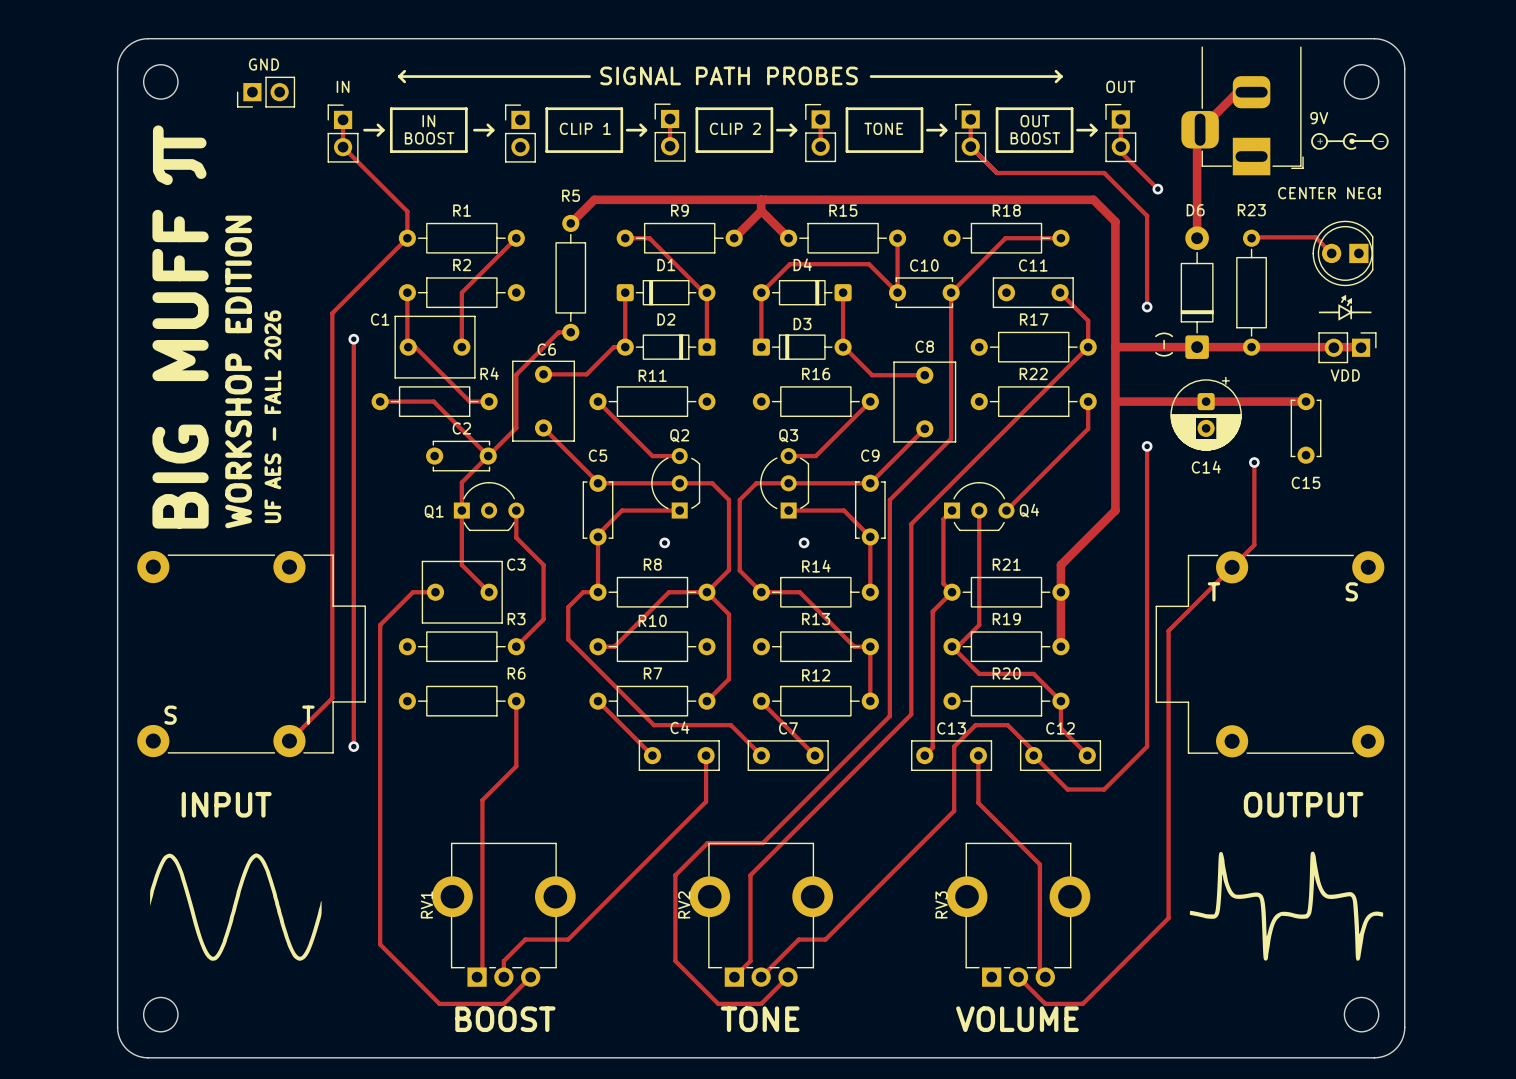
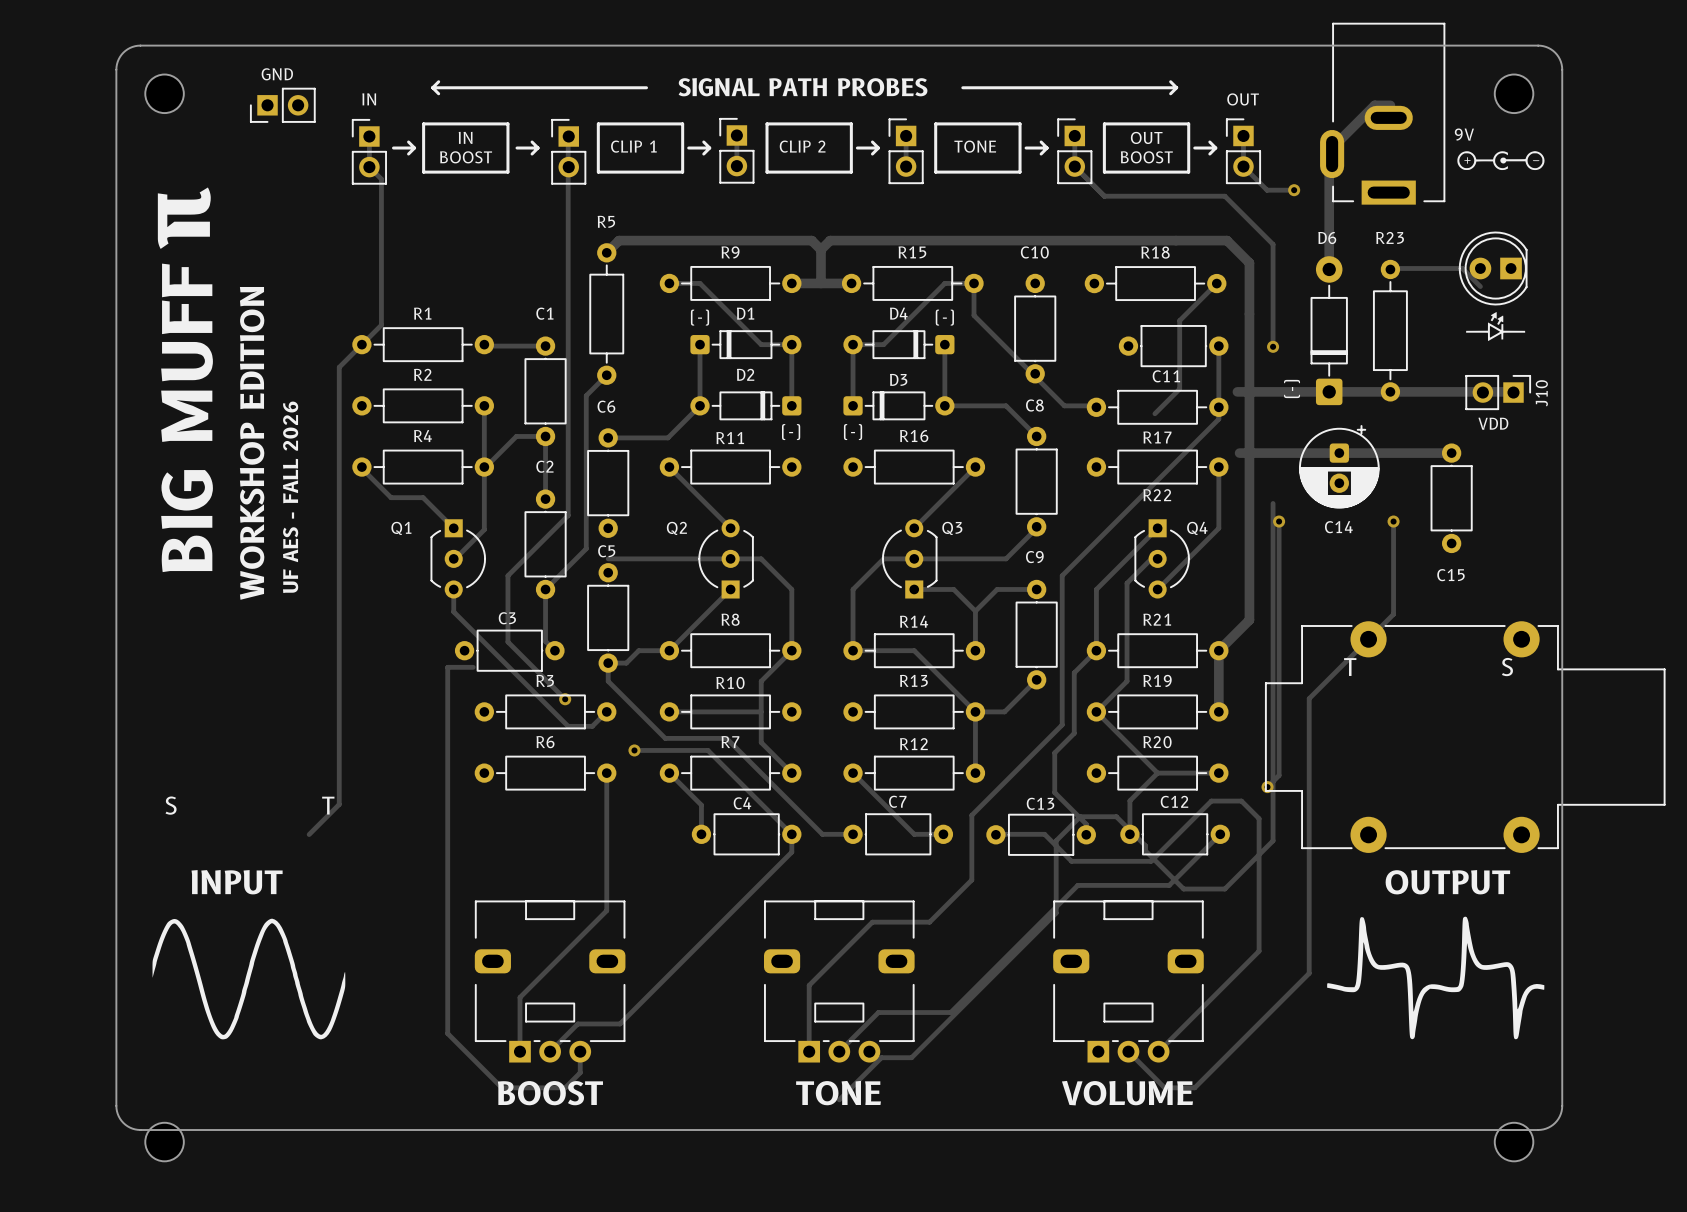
board edge: (147, 38) (1374, 38) (1384, 40) (1393, 45) (1401, 55) (1404, 69) (1404, 1027) (1403, 1037) (1398, 1046) (1387, 1054) (1374, 1057) (147, 1057) (137, 1056) (129, 1051) (120, 1040) (117, 1027) (117, 69) (120, 55) (126, 47) (134, 41) (147, 38) -> (140, 45) (132, 46) (123, 52) (118, 59) (116, 69) (116, 1105) (118, 1116) (125, 1124) (140, 1130) (1538, 1130) (1548, 1127) (1556, 1120) (1562, 1105) (1562, 69) (1559, 59) (1553, 50) (1538, 45) (140, 45)
part: none -> (1382, 113)
part: (1242, 110) -> none
track: none -> (568, 135) (568, 515) (507, 575) (507, 642) (565, 699)
track: (1120, 146) (1120, 152) (1157, 189) -> (1243, 166) (1267, 190)
track: (353, 157) (407, 211) (407, 238) (332, 313) (332, 698) (316, 714) -> (381, 179) (381, 325) (339, 367) (339, 804)
track: none -> (1267, 190) (1294, 190)
via position: (1157, 189) -> (1294, 190)
text: CENTER NEG! (1329, 193) -> none
track: (1106, 212) (1093, 199) (594, 199) (570, 223) -> (1227, 240) (830, 240) (820, 249)
track: none -> (820, 249) (811, 240) (619, 240) (606, 252)
track: none -> (820, 249) (820, 283)
track: (1115, 221) (1115, 510) (1060, 564) (1060, 646) -> (1237, 250) (1249, 262) (1249, 620) (1218, 650) (1218, 711)
R1 position: (461, 238) -> (423, 344)
track: (516, 238) (461, 292) (461, 347) -> none
track: (625, 238) (649, 238) (703, 292) (706, 292) (706, 347) -> none
R9 position: (679, 238) -> (730, 283)
track: (734, 238) (761, 211) (761, 199) (761, 210) (788, 238) -> none
R15 position: (843, 238) -> (912, 283)
track: (897, 238) (897, 292) (869, 264) (789, 264) (761, 292) (761, 347) -> none
R18 position: (1006, 238) -> (1155, 283)
track: (1060, 238) (1005, 238) (951, 292) (951, 438) (889, 500) (889, 716) (762, 843) (707, 843) (675, 875) (675, 961) (718, 1003) (761, 1003) (787, 977) -> none
track: none -> (669, 283) (700, 283) (761, 344) (791, 344) (791, 405)
track: none -> (791, 283) (853, 283)
track: none -> (1216, 283) (1179, 320) (1179, 388) (1154, 413)
part position: (1342, 253) -> (1493, 268)
C10 name position: C10 (924, 265) -> C10 (1034, 252)
C11 name position: C11 (1033, 265) -> C11 (1166, 376)
R5 position: (570, 277) -> (606, 314)
C10 footprint: [888, 277, 960, 309] -> [1014, 273, 1057, 384]
C11 footprint: [992, 277, 1074, 309] -> [1118, 325, 1229, 367]
D1 text: none -> (-) (700, 317)
D4 text: none -> (-) (944, 317)
track: (407, 292) (407, 346) (415, 347) (469, 401) (489, 401) -> none
R2 position: (461, 292) -> (423, 405)
track: (625, 292) (625, 347) (613, 347) (586, 374) (543, 374) -> none
D1 position: (666, 292) -> (745, 344)
D4 position: (802, 292) -> (898, 344)
track: (843, 292) (843, 347) (872, 375) (924, 375) -> none
track: (1060, 292) (1088, 320) (1088, 347) (911, 524) (911, 714) (750, 875) (750, 961) (734, 977) -> none
track: none -> (484, 344) (545, 346)
track: none -> (700, 344) (700, 405) (667, 437) (608, 437)
track: none -> (944, 344) (944, 405) (1006, 405) (1036, 436)
track: none -> (1218, 346) (1218, 419) (1062, 575) (1062, 724) (971, 815) (971, 879) (929, 922) (872, 922) (809, 985) (809, 1051)
drawing position: (1345, 307) -> (1495, 326)
C1 footprint: [394, 315, 476, 379] -> [524, 336, 567, 447]
C1 name position: C1 (380, 319) -> C1 (544, 313)
R17 name position: R17 (1034, 319) -> R17 (1157, 437)
track: none -> (606, 375) (586, 395) (586, 548) (545, 589) (545, 641) (554, 650)
track: (570, 332) (558, 332) (516, 374) (516, 427) (461, 482) (461, 564) (489, 592) -> none
track: (353, 339) (353, 746) -> none
via: (353, 339) -> none
D2 position: (666, 347) -> (745, 405)
D3 position: (802, 347) -> (898, 405)
R17 position: (1033, 347) -> (1157, 407)
J10 name: none -> J10 (1541, 393)
track: none -> (484, 405) (484, 529) (453, 558)
track: none -> (853, 405) (853, 344) (883, 344) (944, 283) (974, 283) (974, 315) (1064, 405) (1096, 405)
C6 footprint: [512, 360, 575, 442] -> [587, 428, 630, 538]
C8 footprint: [893, 361, 957, 443] -> [1015, 426, 1058, 537]
R4 name position: R4 (489, 373) -> R4 (422, 436)
R22 name position: R22 (1033, 373) -> R22 (1157, 495)
D2 text: none -> (-) (791, 432)
D3 text: none -> (-) (853, 432)
C15 footprint: [1290, 393, 1322, 464] -> [1430, 443, 1473, 554]
track: (380, 401) (433, 401) (488, 456) -> none
R4 position: (434, 401) -> (423, 467)
track: (598, 401) (652, 456) (679, 456) -> none
R11 position: (652, 401) -> (730, 467)
R16 position: (815, 401) -> (914, 467)
track: (870, 401) (815, 456) (788, 456) -> none
R22 position: (1033, 401) -> (1157, 467)
track: (1088, 401) (1088, 428) (1006, 510) -> none
track: none -> (361, 467) (391, 497) (423, 497) (453, 528)
track: none -> (484, 467) (516, 436) (545, 436) (545, 499)
track: none -> (669, 467) (730, 528)
track: none -> (975, 467) (914, 528)
track: none -> (1218, 467) (1218, 528) (1157, 589)
track: (543, 427) (598, 483) (712, 483) (729, 500) (729, 570) (706, 592) -> none
C2 name position: C2 (461, 428) -> C2 (544, 466)
track: (924, 428) (870, 483) (756, 483) (739, 500) (739, 570) (761, 592) (799, 592) (854, 646) (870, 646) (870, 701) -> none
Q2 name position: Q2 (679, 435) -> Q2 (676, 528)
Q3 name position: Q3 (788, 435) -> Q3 (952, 528)
C2 footprint: [426, 440, 497, 472] -> [524, 489, 567, 600]
via position: (1147, 446) -> (1279, 521)
track: none -> (1279, 521) (1279, 775) (1267, 787)
track: none -> (1036, 526) (1006, 558) (883, 558) (853, 589) (853, 650) (914, 650) (975, 711)
track: none -> (1157, 528) (1096, 589) (1096, 650) (1074, 672) (1074, 733) (1054, 752) (1054, 792) (1086, 824) (1086, 834)
C5 footprint: [582, 474, 614, 546] -> [587, 563, 630, 673]
C9 footprint: [854, 474, 886, 546] -> [1015, 579, 1058, 690]
Q2 position: (675, 483) -> (726, 558)
Q3 position: (784, 483) -> (909, 558)
track: none -> (608, 558) (761, 558) (791, 589) (791, 650) (761, 681) (761, 742) (791, 773)
track: none -> (1157, 558) (1151, 558) (1127, 583) (1127, 681) (1096, 711) (1157, 773)
Q1 rotation: 0° (489, 506) -> 90° clockwise (458, 558)
Q1 position: (489, 506) -> (458, 558)
Q4 rotation: 0° (979, 506) -> 90° clockwise (1162, 558)
Q4 position: (979, 506) -> (1162, 558)
track: (516, 510) (516, 537) (543, 564) (543, 619) (516, 646) -> none
track: (679, 510) (622, 510) (598, 534) (598, 592) (583, 592) (568, 607) (568, 639) (653, 725) (730, 725) (761, 755) -> none
track: (788, 510) (843, 510) (870, 536) (870, 592) -> none
track: (952, 510) (943, 519) (943, 583) (952, 592) (932, 611) (932, 747) (924, 755) -> none
track: (979, 510) (979, 625) (957, 646) (952, 646) (979, 673) (1033, 673) (1060, 701) (1060, 728) (1087, 755) -> none
Q4 name position: Q4 (1029, 510) -> Q4 (1197, 528)
Q1 name position: Q1 (434, 511) -> Q1 (401, 528)
track: none -> (453, 589) (453, 611) (568, 726) (592, 726) (606, 711)
track: none -> (730, 589) (669, 650) (638, 650) (626, 663) (608, 663) (608, 681) (665, 738) (726, 738) (822, 834) (853, 834)
track: none -> (914, 589) (953, 589) (975, 611)
track: none -> (1036, 589) (997, 589) (975, 611)
via: (664, 542) -> none
via: (804, 542) -> none
track: none -> (975, 611) (975, 650)
C3 footprint: [421, 560, 503, 624] -> [454, 629, 565, 672]
C3 name position: C3 (516, 564) -> C3 (507, 618)
track: (412, 592) (380, 625) (380, 944) (439, 1003) (503, 1003) (530, 977) -> (447, 667) (447, 1033) (501, 1087) (565, 1087) (580, 1072) (580, 1051)
R8 position: (652, 592) -> (730, 650)
track: (706, 592) (668, 592) (614, 646) (598, 646) -> none
track: (706, 592) (729, 614) (729, 679) (706, 701) -> none
R14 position: (815, 592) -> (914, 650)
R21 position: (1006, 592) -> (1157, 650)
track: none -> (1036, 679) (1004, 711) (975, 711)
R3 name position: R3 (516, 619) -> R3 (545, 680)
via: none -> (565, 699)
track: (1179, 620) (1168, 630) (1168, 918) (1082, 1003) (1045, 1003) (1018, 977) -> (1309, 698) (1309, 973) (1194, 1087) (1164, 1087) (1128, 1051)
track: none -> (669, 711) (761, 711)
track: none -> (975, 711) (975, 773)
R3 position: (461, 646) -> (545, 711)
R10 position: (652, 646) -> (730, 711)
R13 position: (815, 646) -> (914, 711)
R19 position: (1006, 646) -> (1157, 711)
part: (251, 654) -> none
part: (1270, 654) -> none
part: none -> (1465, 737)
track: none -> (634, 750) (707, 750) (791, 834) (791, 852) (620, 1023) (577, 1023) (550, 1051) (550, 1057)
via: none -> (634, 750)
R6 name position: R6 (516, 673) -> R6 (545, 742)
track: none -> (606, 773) (606, 910) (520, 997) (520, 1051)
track: none -> (669, 773) (701, 805) (701, 834)
track: none -> (853, 773) (914, 834) (943, 834)
track: none -> (1157, 773) (1218, 773)
track: none -> (1157, 773) (1129, 800) (1129, 834)
via: none -> (1267, 787)
R6 position: (461, 701) -> (545, 773)
track: (516, 701) (516, 766) (482, 800) (482, 971) (477, 977) -> none
track: (598, 701) (652, 755) -> none
R7 position: (652, 701) -> (730, 773)
track: (761, 701) (815, 755) -> none
R12 position: (815, 701) -> (914, 773)
R20 position: (1006, 701) -> (1157, 773)
C4 footprint: [638, 740, 720, 771] -> [691, 813, 802, 856]
C7 footprint: [747, 740, 829, 771] -> [843, 813, 954, 856]
C13 footprint: [911, 740, 993, 771] -> [986, 813, 1096, 856]
C12 footprint: [1019, 740, 1102, 771] -> [1120, 813, 1230, 856]
track: none -> (1220, 834) (1169, 885) (1077, 885) (950, 1012) (878, 1012) (839, 1051)
track: none -> (995, 834) (1044, 834) (1071, 861) (1151, 861) (1211, 801) (1241, 801) (1259, 818) (1259, 951) (1158, 1051)
via: (353, 746) -> none
track: (706, 755) (706, 801) (568, 939) (525, 939) (503, 961) (503, 977) -> none
track: (978, 755) (978, 803) (1039, 864) (1039, 971) (1045, 977) -> none
text position: INPUT (226, 804) -> INPUT (237, 882)
text position: OUTPUT (1303, 804) -> OUTPUT (1447, 882)
part: none -> (550, 981)
part: none -> (839, 981)
part: none -> (1128, 981)
drawing position: (1286, 906) -> (1435, 977)
drawing position: (235, 907) -> (248, 979)
RV1: (503, 914) -> none
RV2: (761, 914) -> none
RV3: (1018, 914) -> none
text position: BOOST (505, 1019) -> BOOST (550, 1093)
text position: TONE (760, 1019) -> TONE (838, 1093)
text position: VOLUME (1017, 1019) -> VOLUME (1127, 1093)

